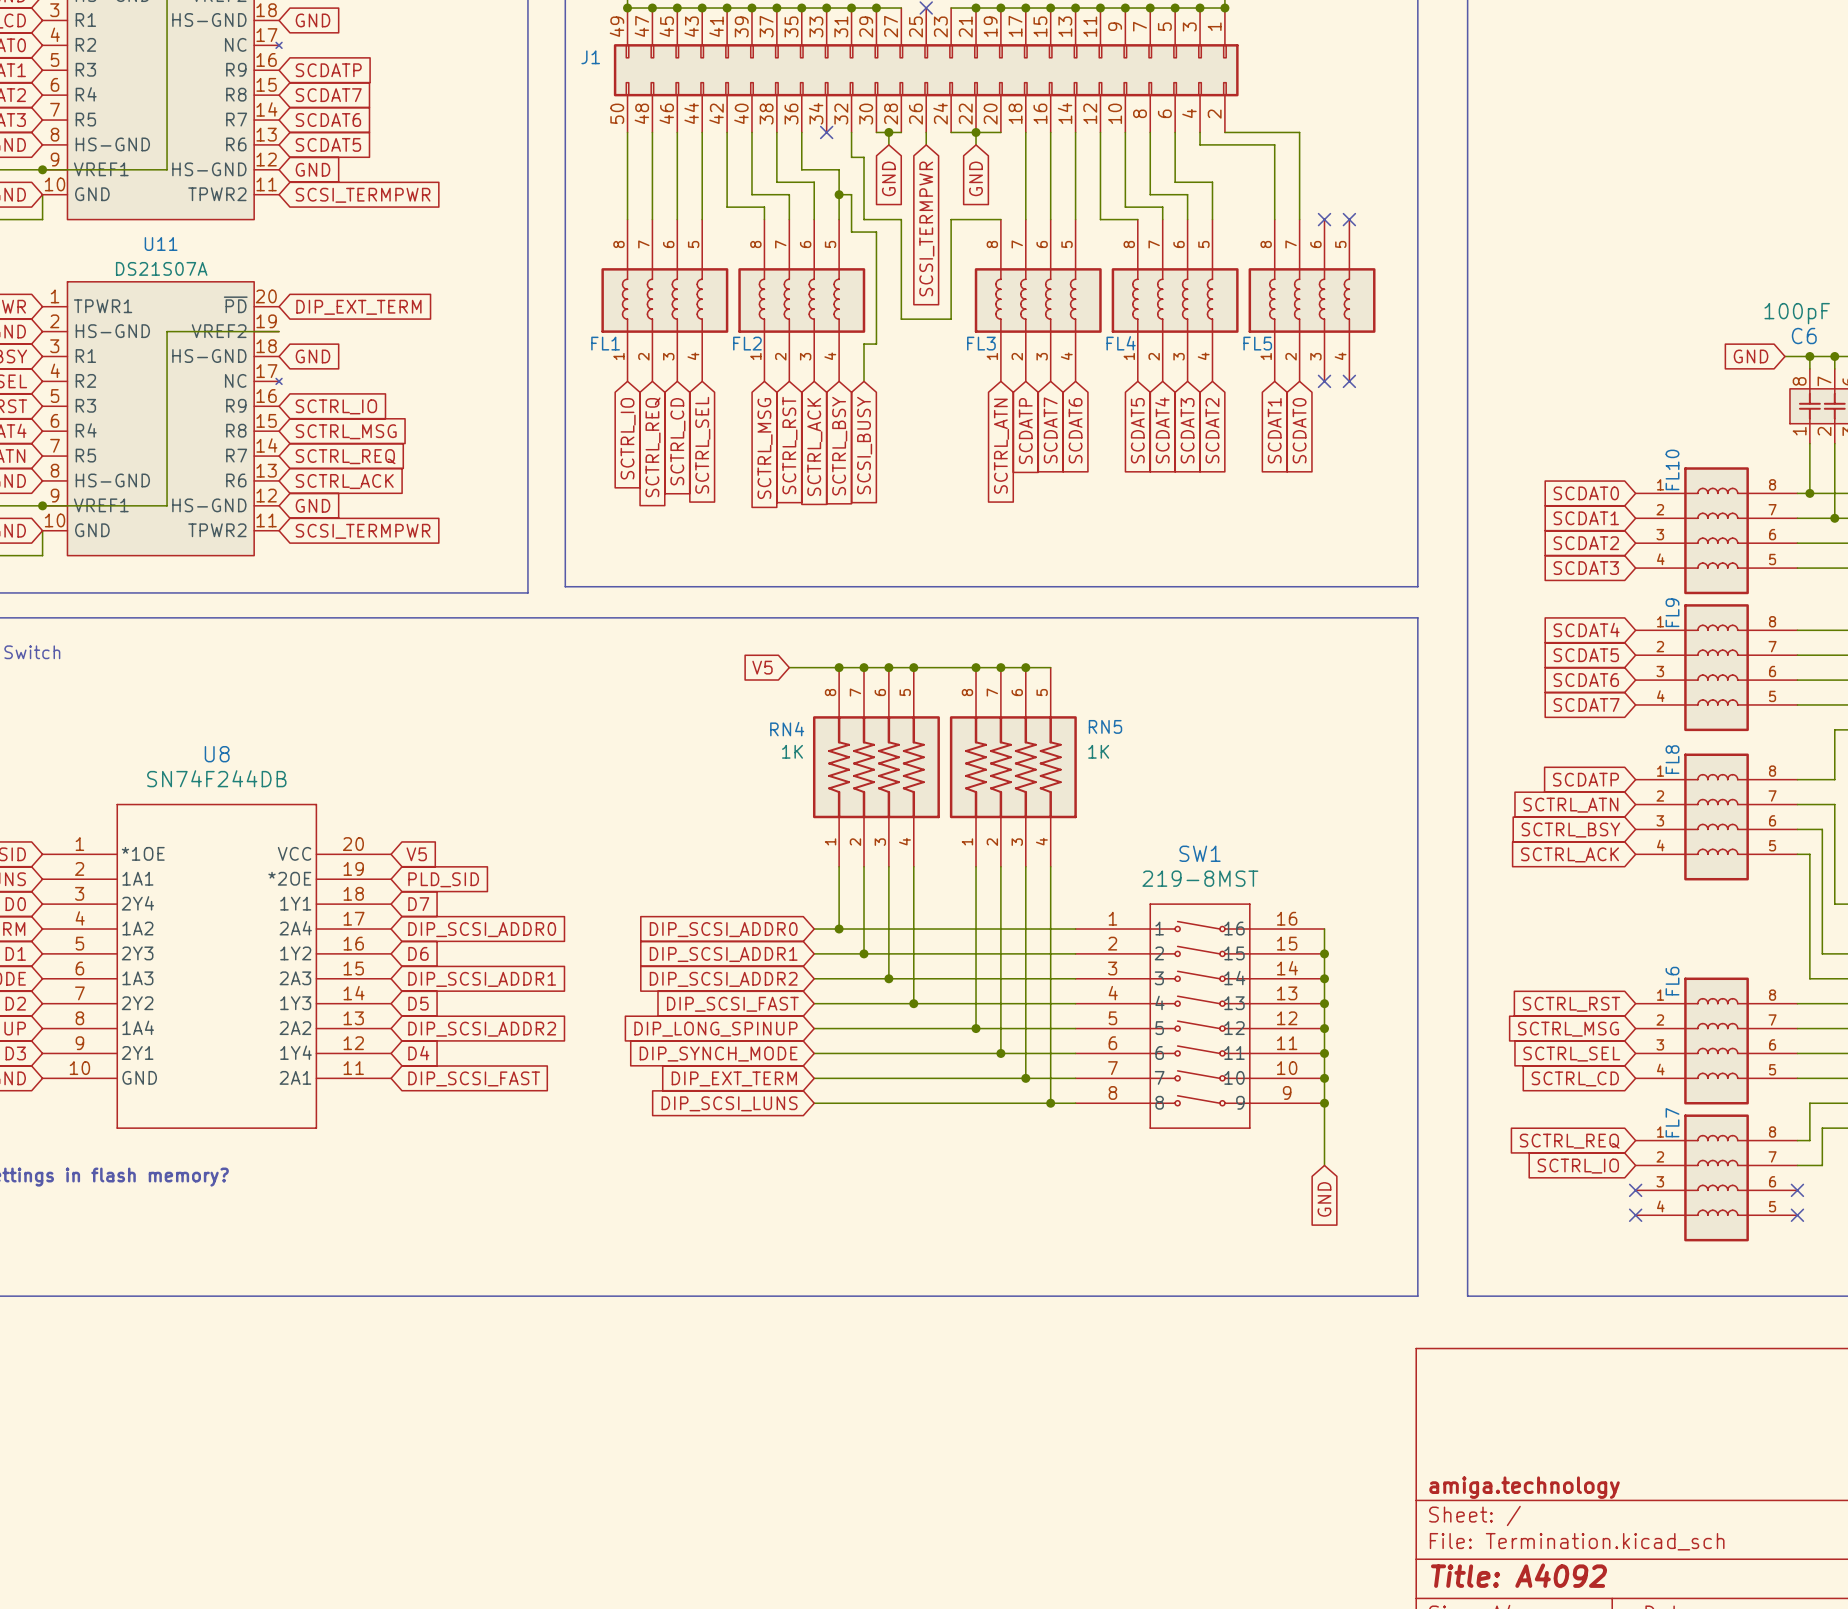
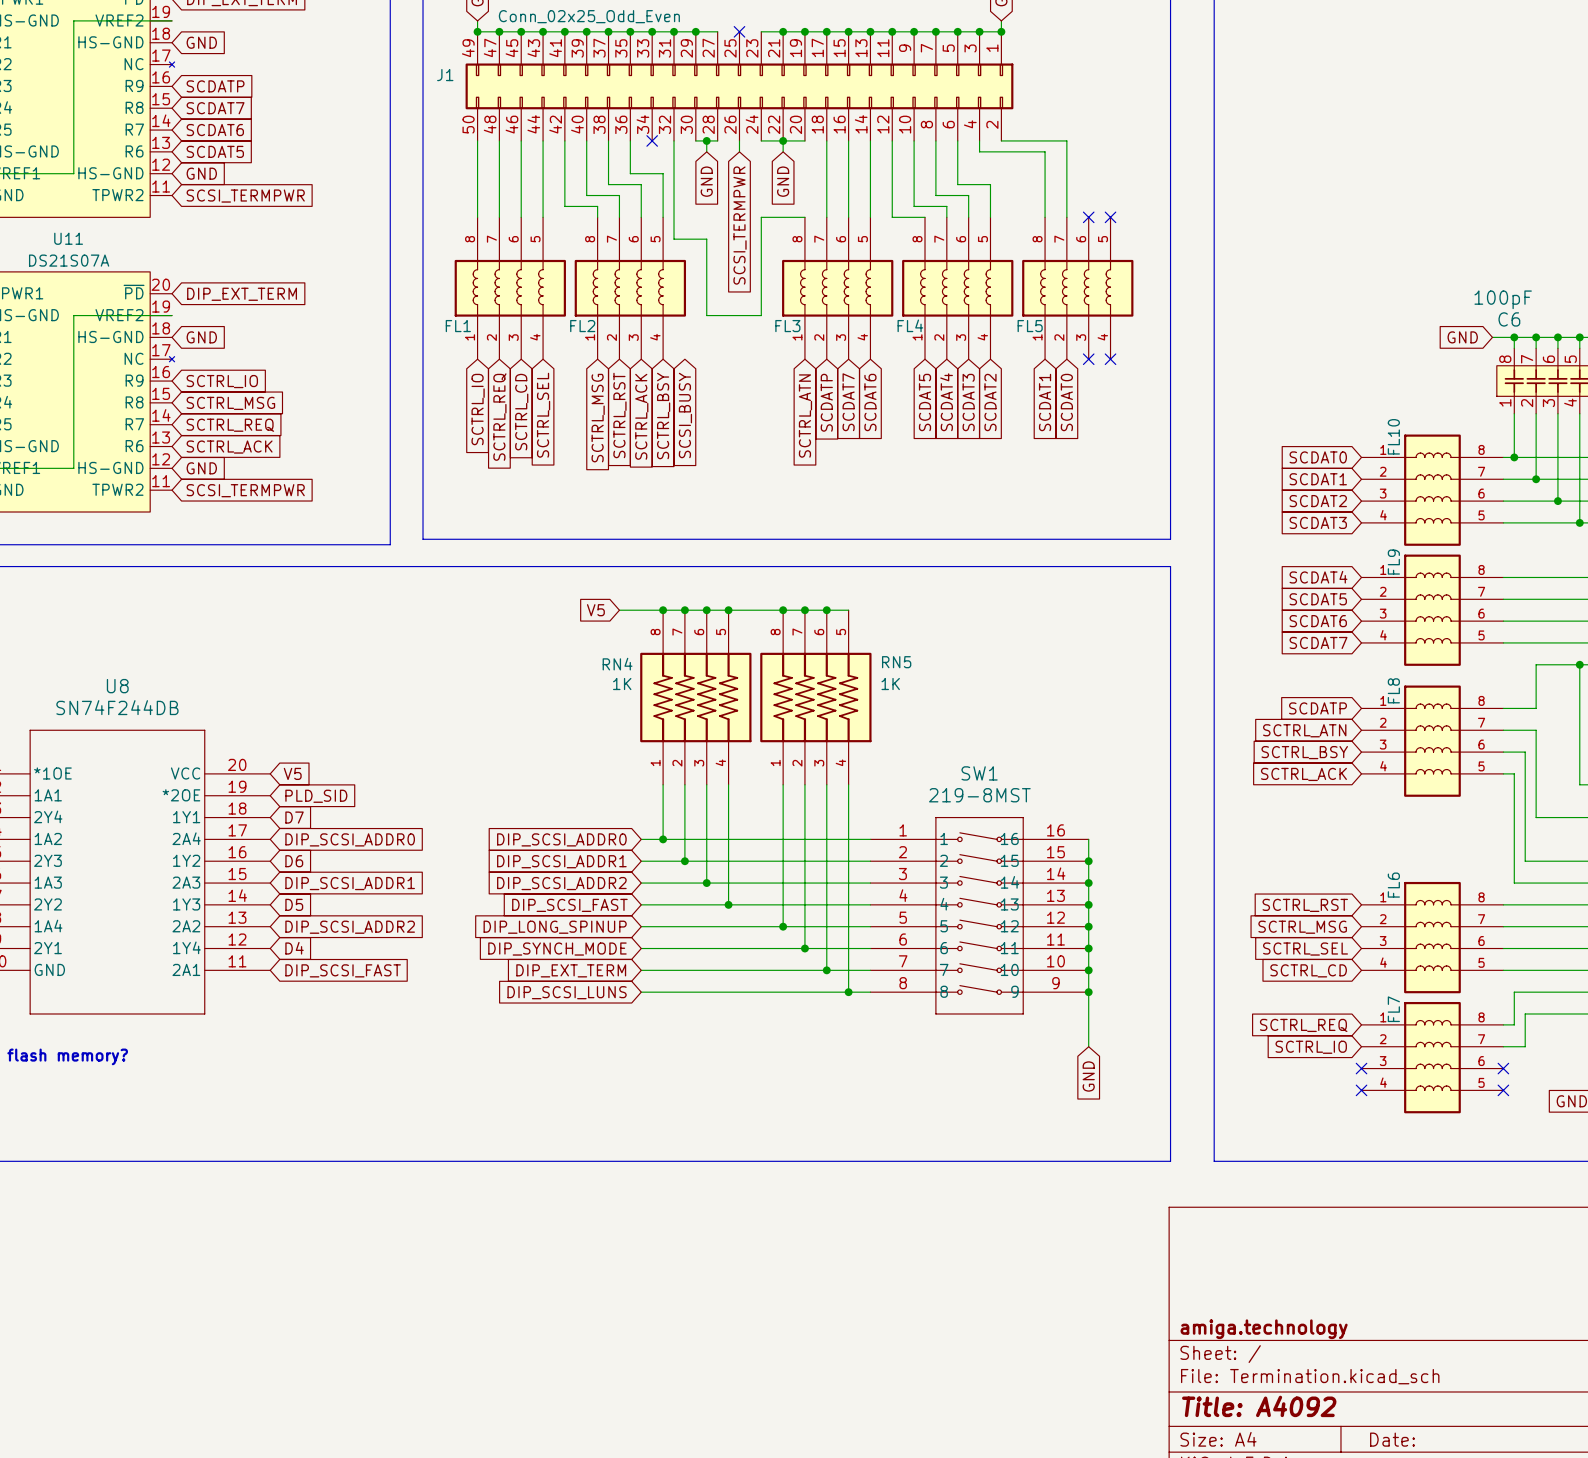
wire: (851, 157) (864, 157) (864, 219) (901, 219) (901, 319) (951, 319) -> (674, 228) (674, 239) (706, 239) (706, 315) (761, 315) (761, 304)
wire: (839, 194) (851, 194) -> (674, 162) (674, 195)
junction: (839, 194) -> none
wire: (851, 232) (876, 232) (876, 344) (864, 344) (864, 381) -> none

